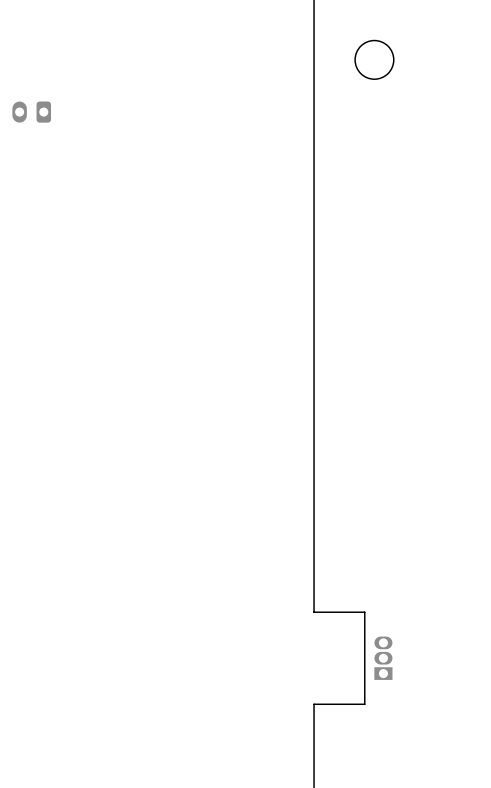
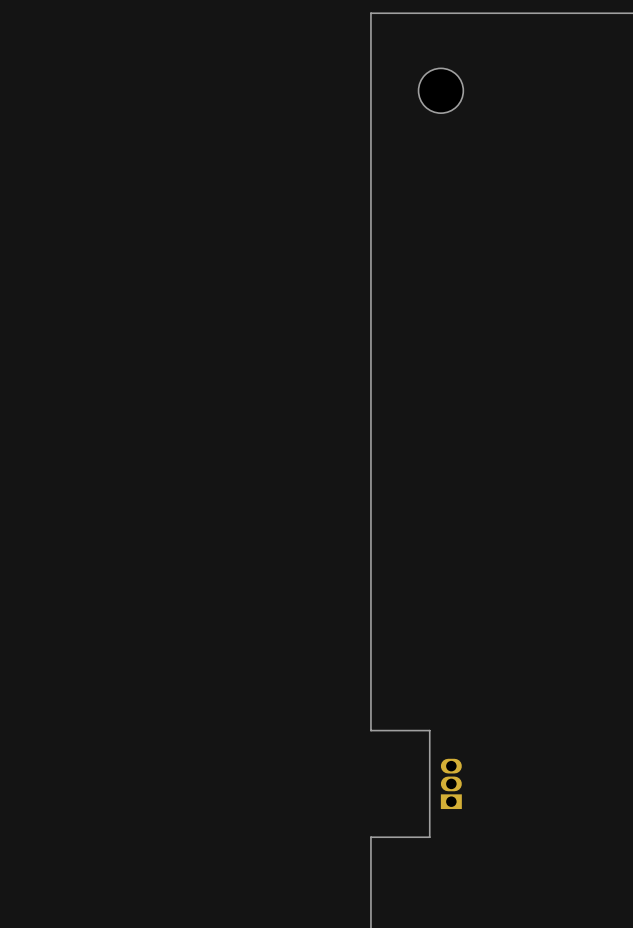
part: (31, 112) -> none

